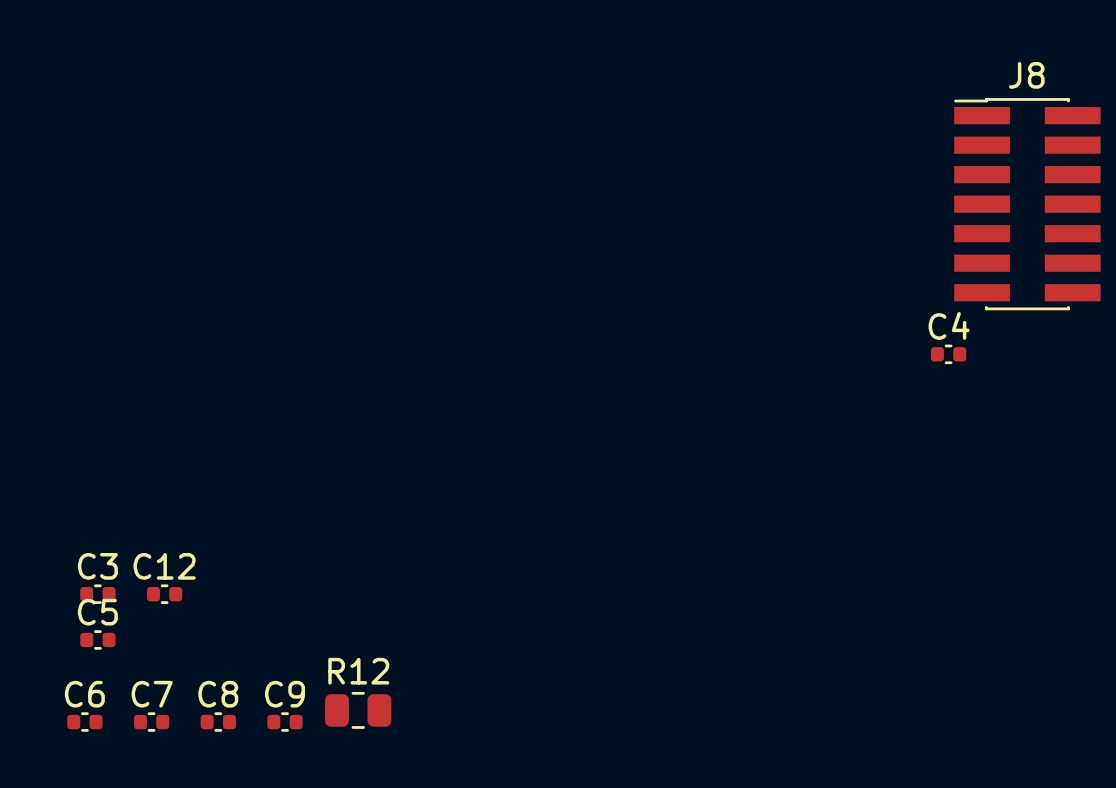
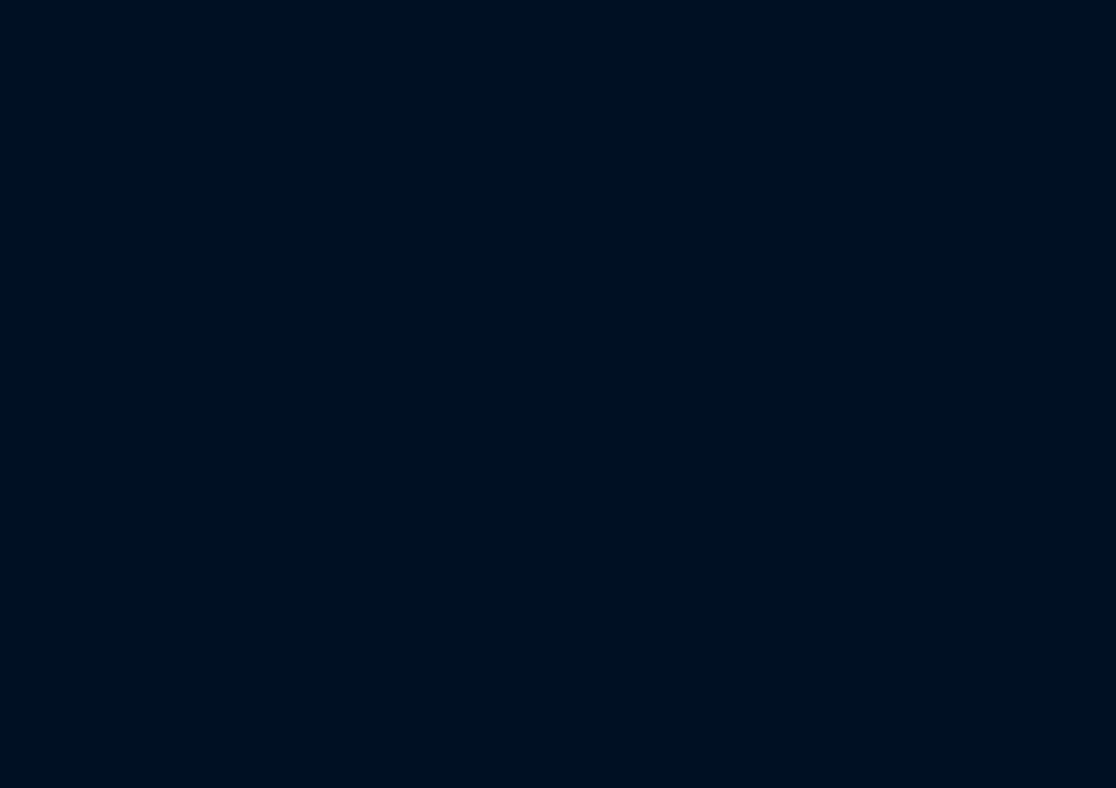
J8: (1027, 204) -> none
C4: (948, 354) -> none
C3: (97, 594) -> none
C12: (164, 594) -> none
C5: (97, 639) -> none
R12: (358, 710) -> none
C6: (84, 722) -> none
C7: (151, 722) -> none
C8: (218, 722) -> none
C9: (284, 722) -> none

